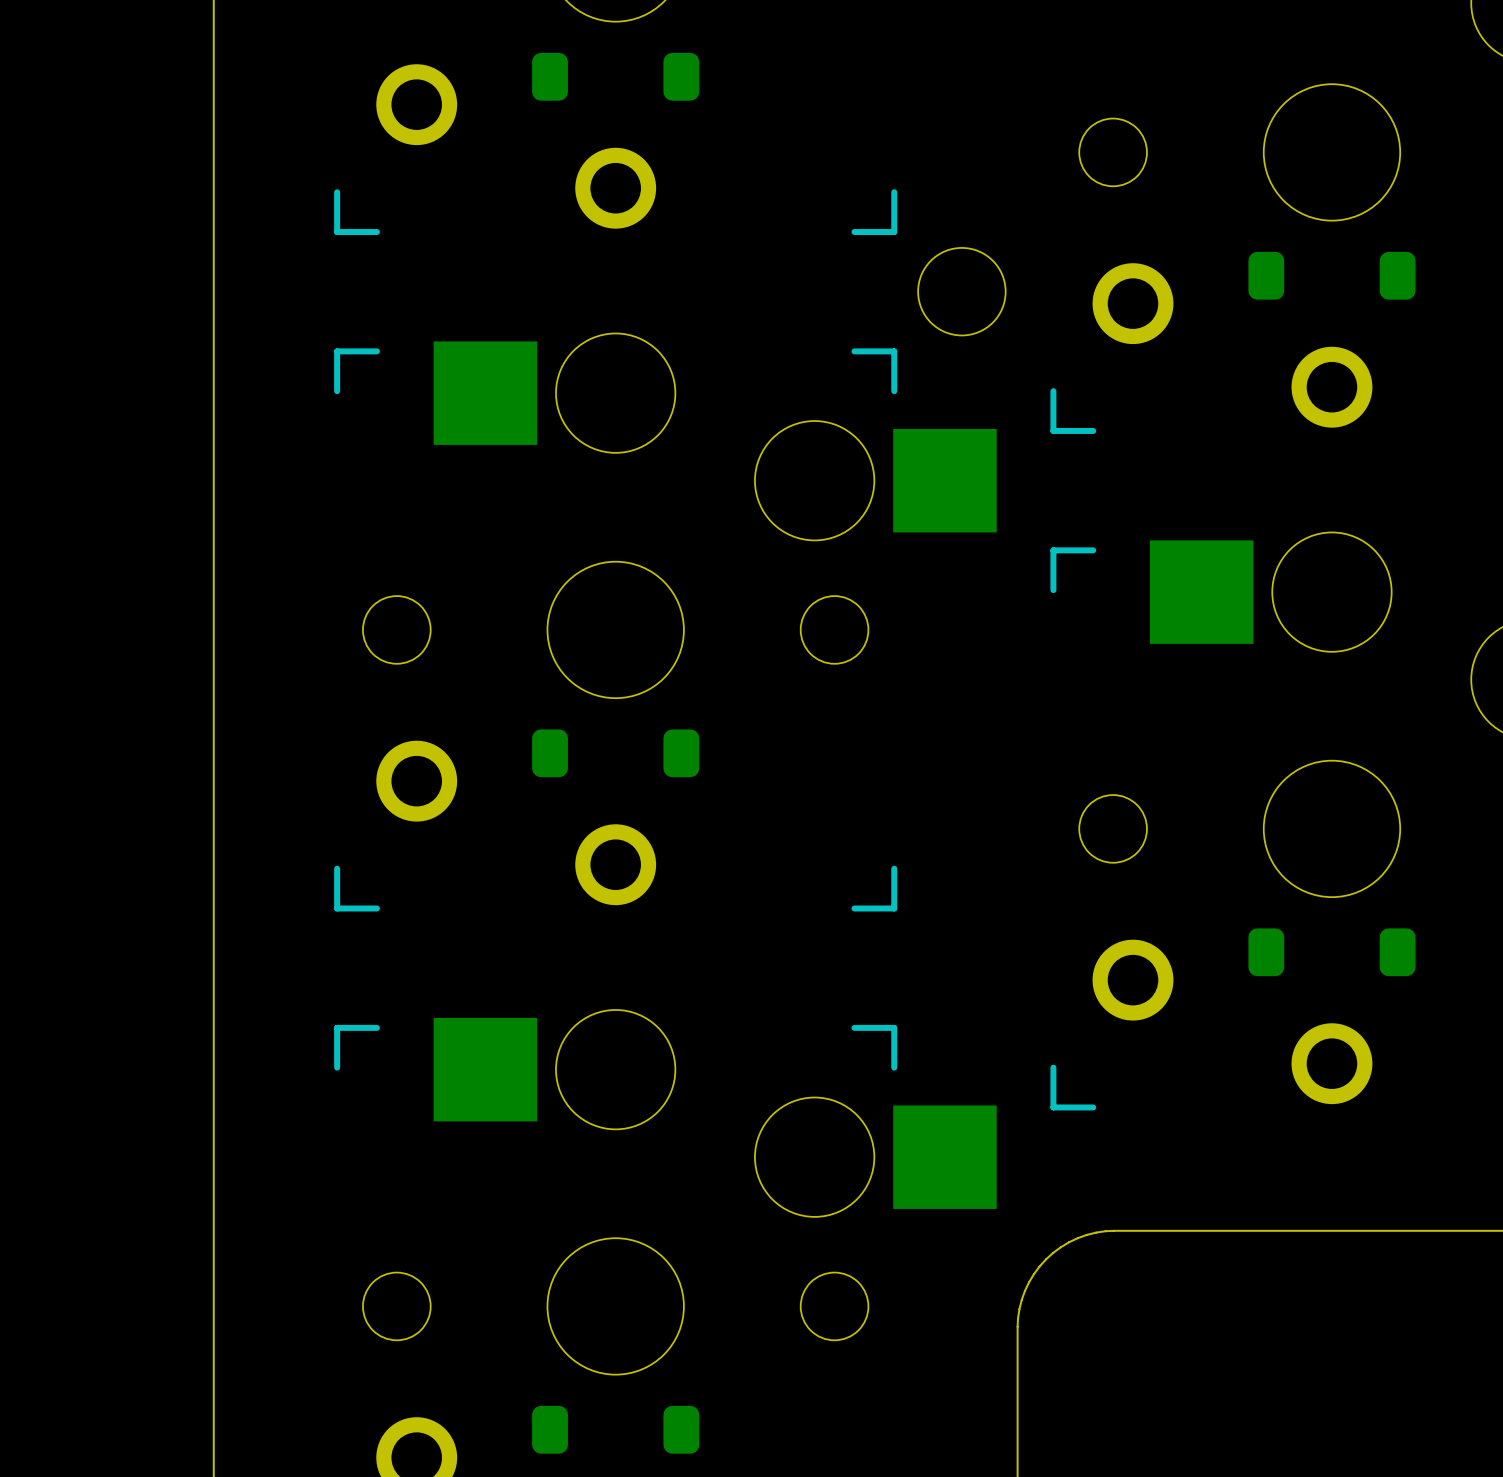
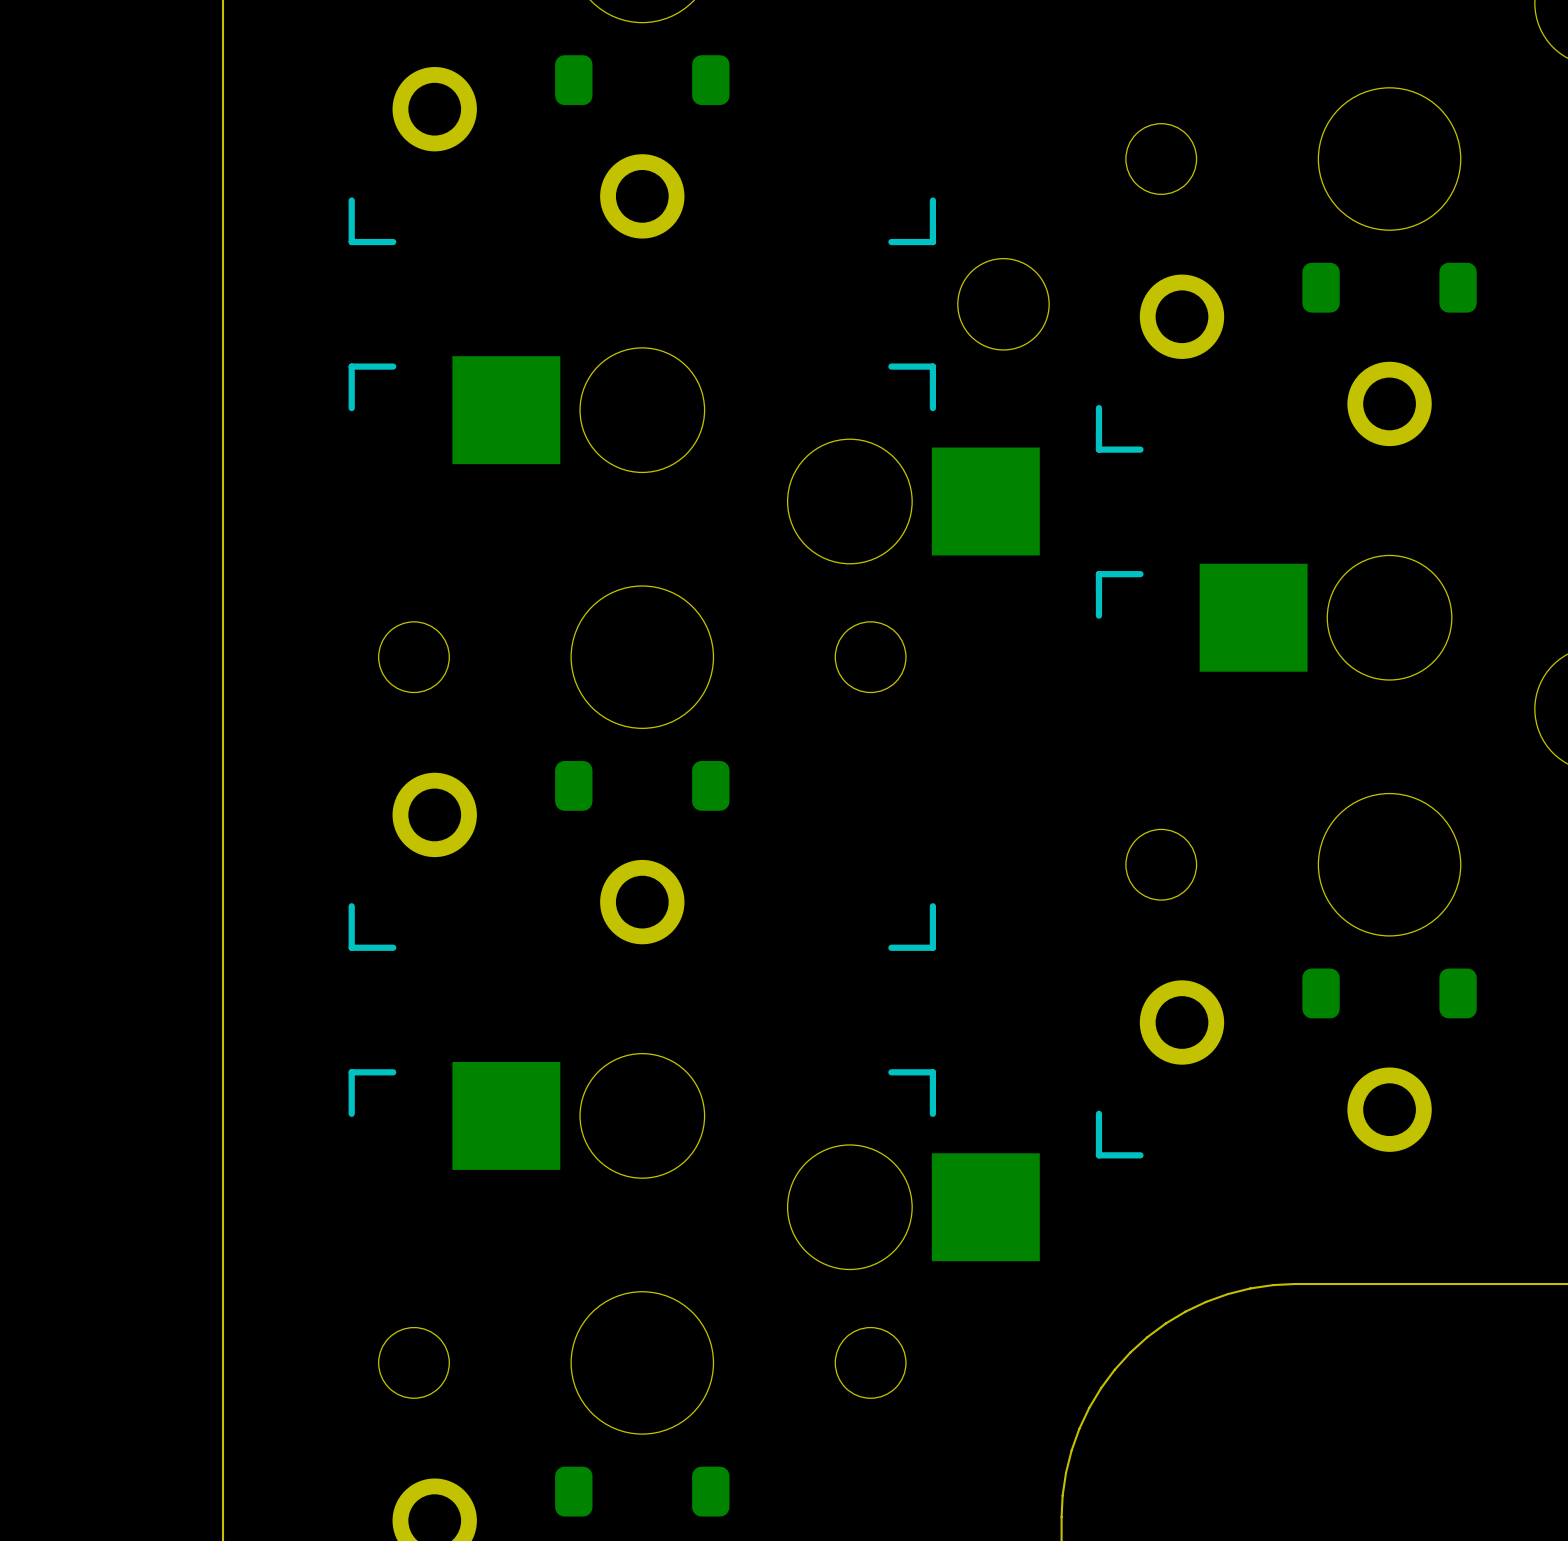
board edge: (1240, 1230) (1105, 1231) (1086, 1234) (1069, 1242) (1046, 1259) (1029, 1282) (1021, 1299) (1017, 1318) (1017, 1454) -> (1294, 1284) (1250, 1288) (1206, 1301) (1165, 1323) (1130, 1352) (1101, 1388) (1079, 1428) (1066, 1472) (1061, 1516)

